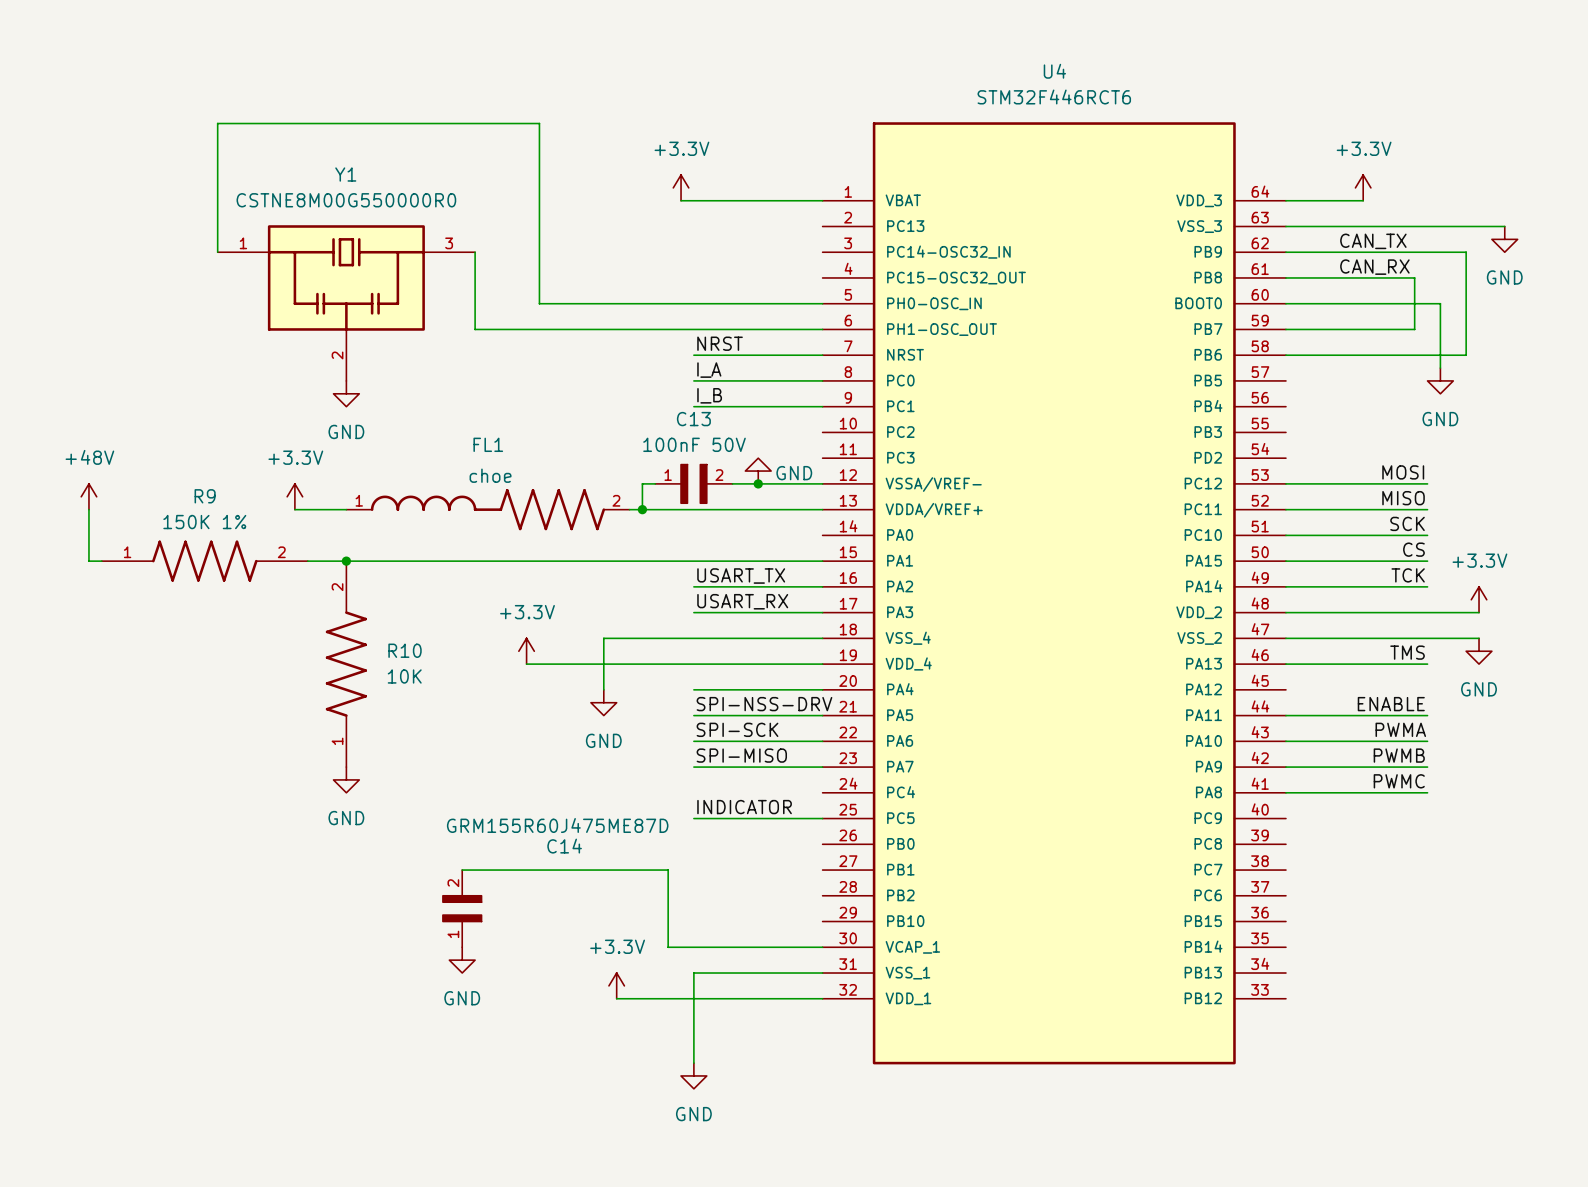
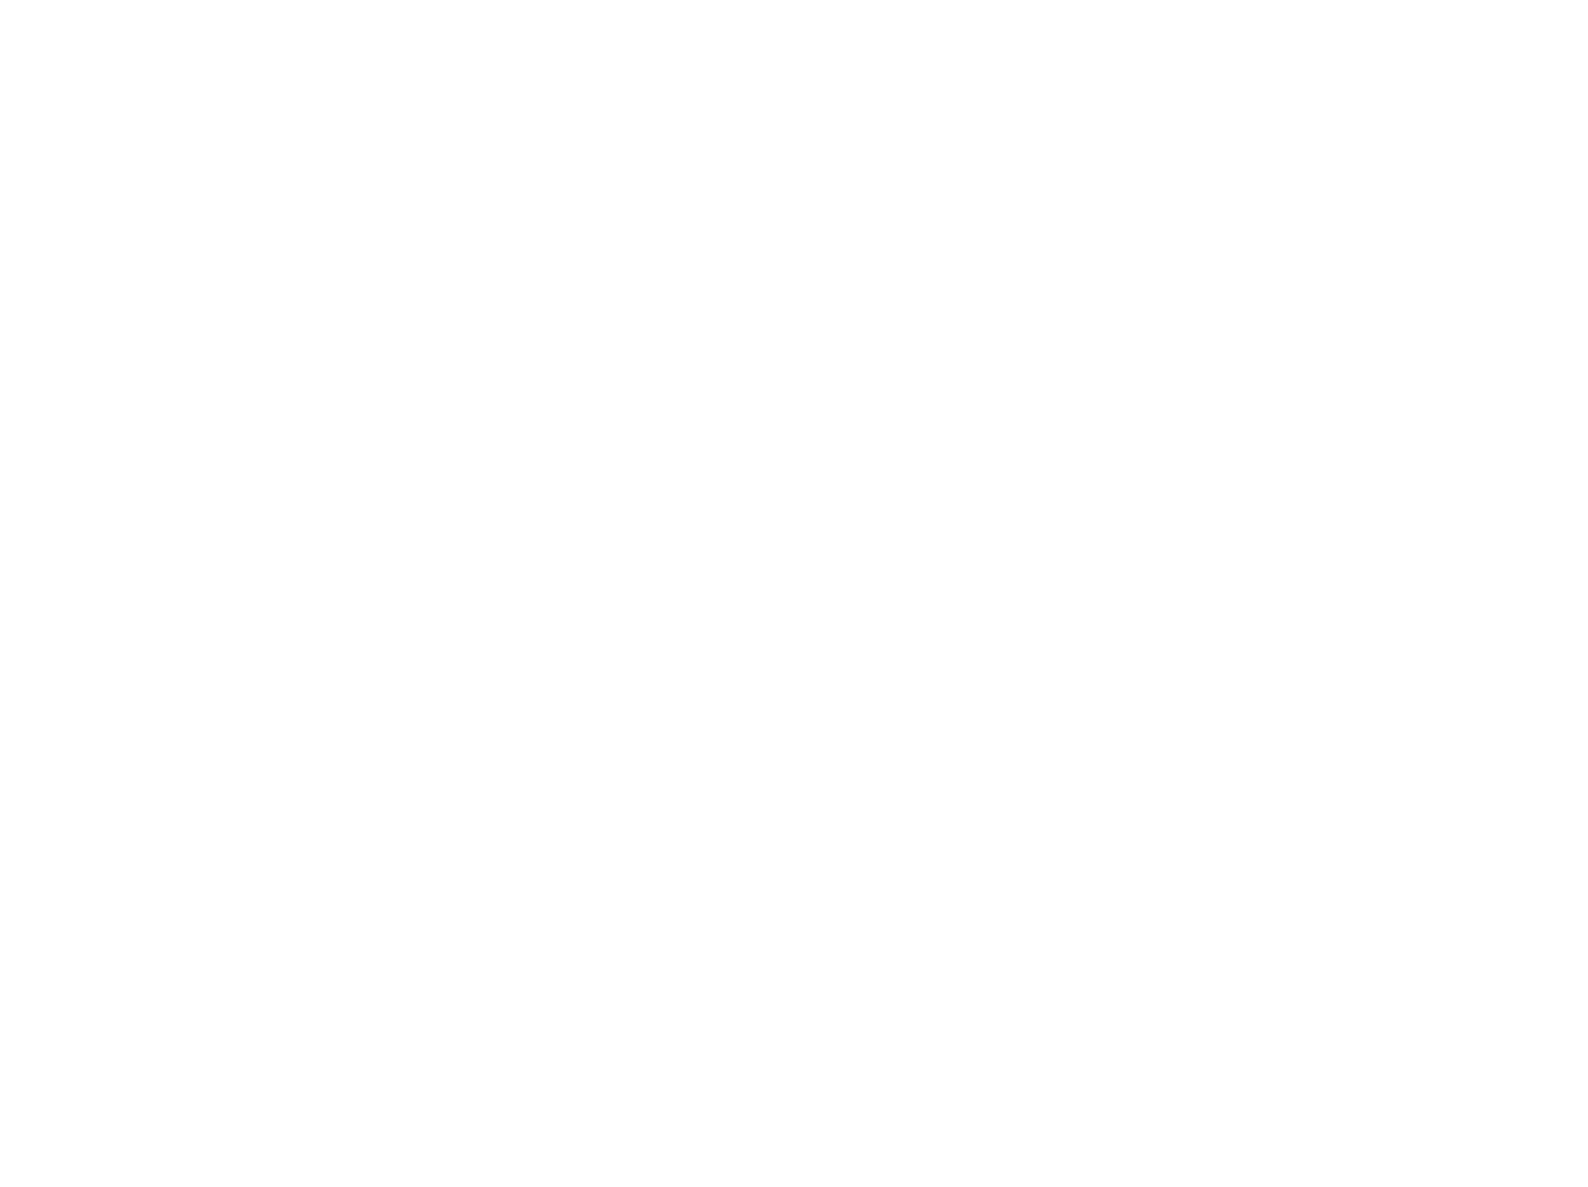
power symbol: +3.3V (681, 187) -> none
power symbol: +3.3V (1363, 187) -> none
wire: (681, 200) (822, 200) -> none
wire: (1285, 200) (1363, 200) -> none
wire: (1285, 226) (1504, 226) -> none
power symbol: GND (1504, 239) -> none
label: CAN_TX (1373, 241) -> none
wire: (217, 252) (217, 123) (539, 123) (539, 303) (822, 303) -> none
wire: (475, 252) (475, 329) (822, 329) -> none
wire: (1285, 252) (1466, 252) (1466, 355) (1285, 355) -> none
label: CAN_RX (1374, 267) -> none
wire: (1285, 277) (1414, 277) (1414, 329) (1285, 329) -> none
Y1: CSTNE8M00G550000R0 (346, 303) -> none
wire: (1285, 303) (1440, 303) (1440, 368) -> none
label: NRST (720, 343) -> none
wire: (693, 355) (822, 355) -> none
label: I_A (709, 370) -> none
wire: (693, 380) (822, 380) -> none
power symbol: GND (1440, 380) -> none
power symbol: GND (346, 393) -> none
label: I_B (709, 395) -> none
wire: (693, 406) (822, 406) -> none
power symbol: GND (758, 471) -> none
label: MOSI (1403, 472) -> none
wire: (655, 483) (642, 483) (642, 509) -> none
C13: 100nF 50V (693, 483) -> none
wire: (732, 483) (822, 483) -> none
junction: (758, 483) -> none
wire: (1285, 483) (1427, 483) -> none
power symbol: +48V (88, 496) -> none
power symbol: +3.3V (294, 496) -> none
label: MISO (1403, 498) -> none
wire: (88, 509) (88, 561) (101, 561) -> none
wire: (294, 509) (346, 509) -> none
FL1: choe (487, 509) -> none
wire: (629, 509) (822, 509) -> none
junction: (642, 509) -> none
wire: (1285, 509) (1427, 509) -> none
label: SCK (1407, 523) -> none
wire: (1285, 535) (1427, 535) -> none
label: CS (1413, 549) -> none
R9: 150K 1% (204, 561) -> none
wire: (307, 561) (822, 561) -> none
junction: (346, 561) -> none
wire: (1285, 561) (1427, 561) -> none
label: TCK (1408, 575) -> none
label: USART_TX (741, 576) -> none
wire: (693, 586) (822, 586) -> none
wire: (1285, 586) (1427, 586) -> none
U4: STM32F446RCT6 (1054, 593) -> none
power symbol: +3.3V (1479, 599) -> none
label: USART_RX (742, 601) -> none
wire: (693, 612) (822, 612) -> none
wire: (1285, 612) (1479, 612) -> none
wire: (822, 638) (603, 638) (603, 689) -> none
wire: (1285, 638) (1479, 638) -> none
power symbol: +3.3V (526, 651) -> none
power symbol: GND (1479, 651) -> none
label: TMS (1407, 652) -> none
R10: 10K (346, 664) -> none
wire: (526, 664) (822, 664) -> none
wire: (1285, 664) (1427, 664) -> none
wire: (693, 689) (822, 689) -> none
power symbol: GND (603, 702) -> none
label: SPI-NSS-DRV (764, 704) -> none
label: ENABLE (1391, 704) -> none
wire: (693, 715) (822, 715) -> none
wire: (1285, 715) (1427, 715) -> none
label: SPI-SCK (737, 729) -> none
label: PWMA (1400, 729) -> none
wire: (693, 741) (822, 741) -> none
wire: (1285, 741) (1427, 741) -> none
label: SPI-MISO (741, 755) -> none
label: PWMB (1399, 755) -> none
wire: (693, 767) (822, 767) -> none
wire: (1285, 767) (1427, 767) -> none
power symbol: GND (346, 779) -> none
label: PWMC (1399, 781) -> none
wire: (1285, 792) (1427, 792) -> none
label: INDICATOR (744, 807) -> none
wire: (693, 818) (822, 818) -> none
wire: (462, 870) (668, 870) (668, 947) (822, 947) -> none
C14: GRM155R60J475ME87D (462, 908) -> none
power symbol: GND (462, 960) -> none
wire: (822, 973) (693, 973) (693, 1063) -> none
power symbol: +3.3V (616, 985) -> none
wire: (616, 998) (822, 998) -> none
power symbol: GND (693, 1075) -> none

